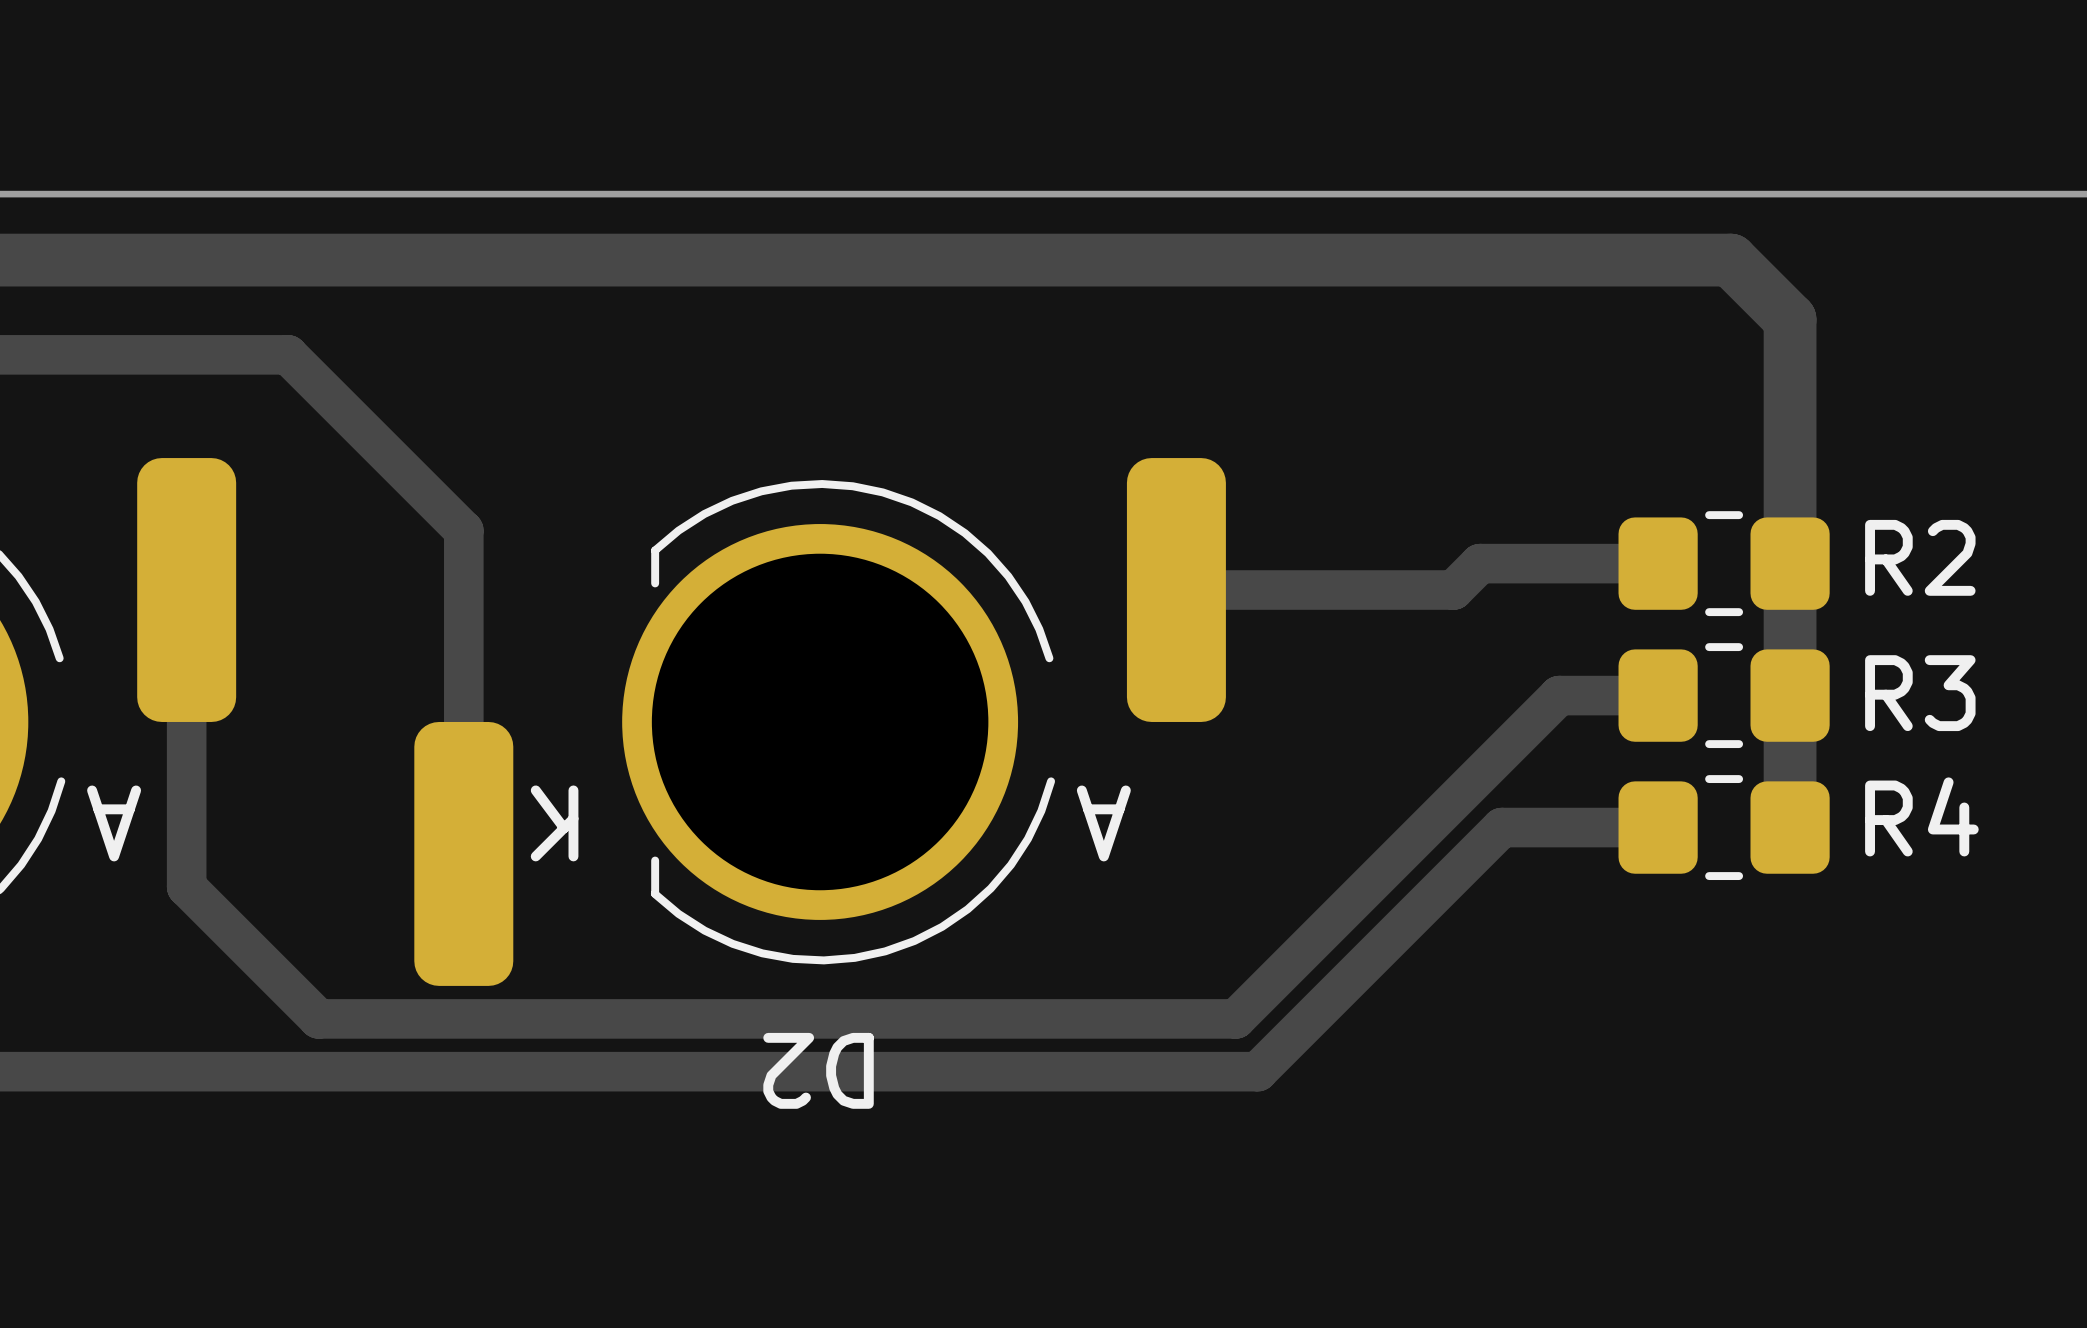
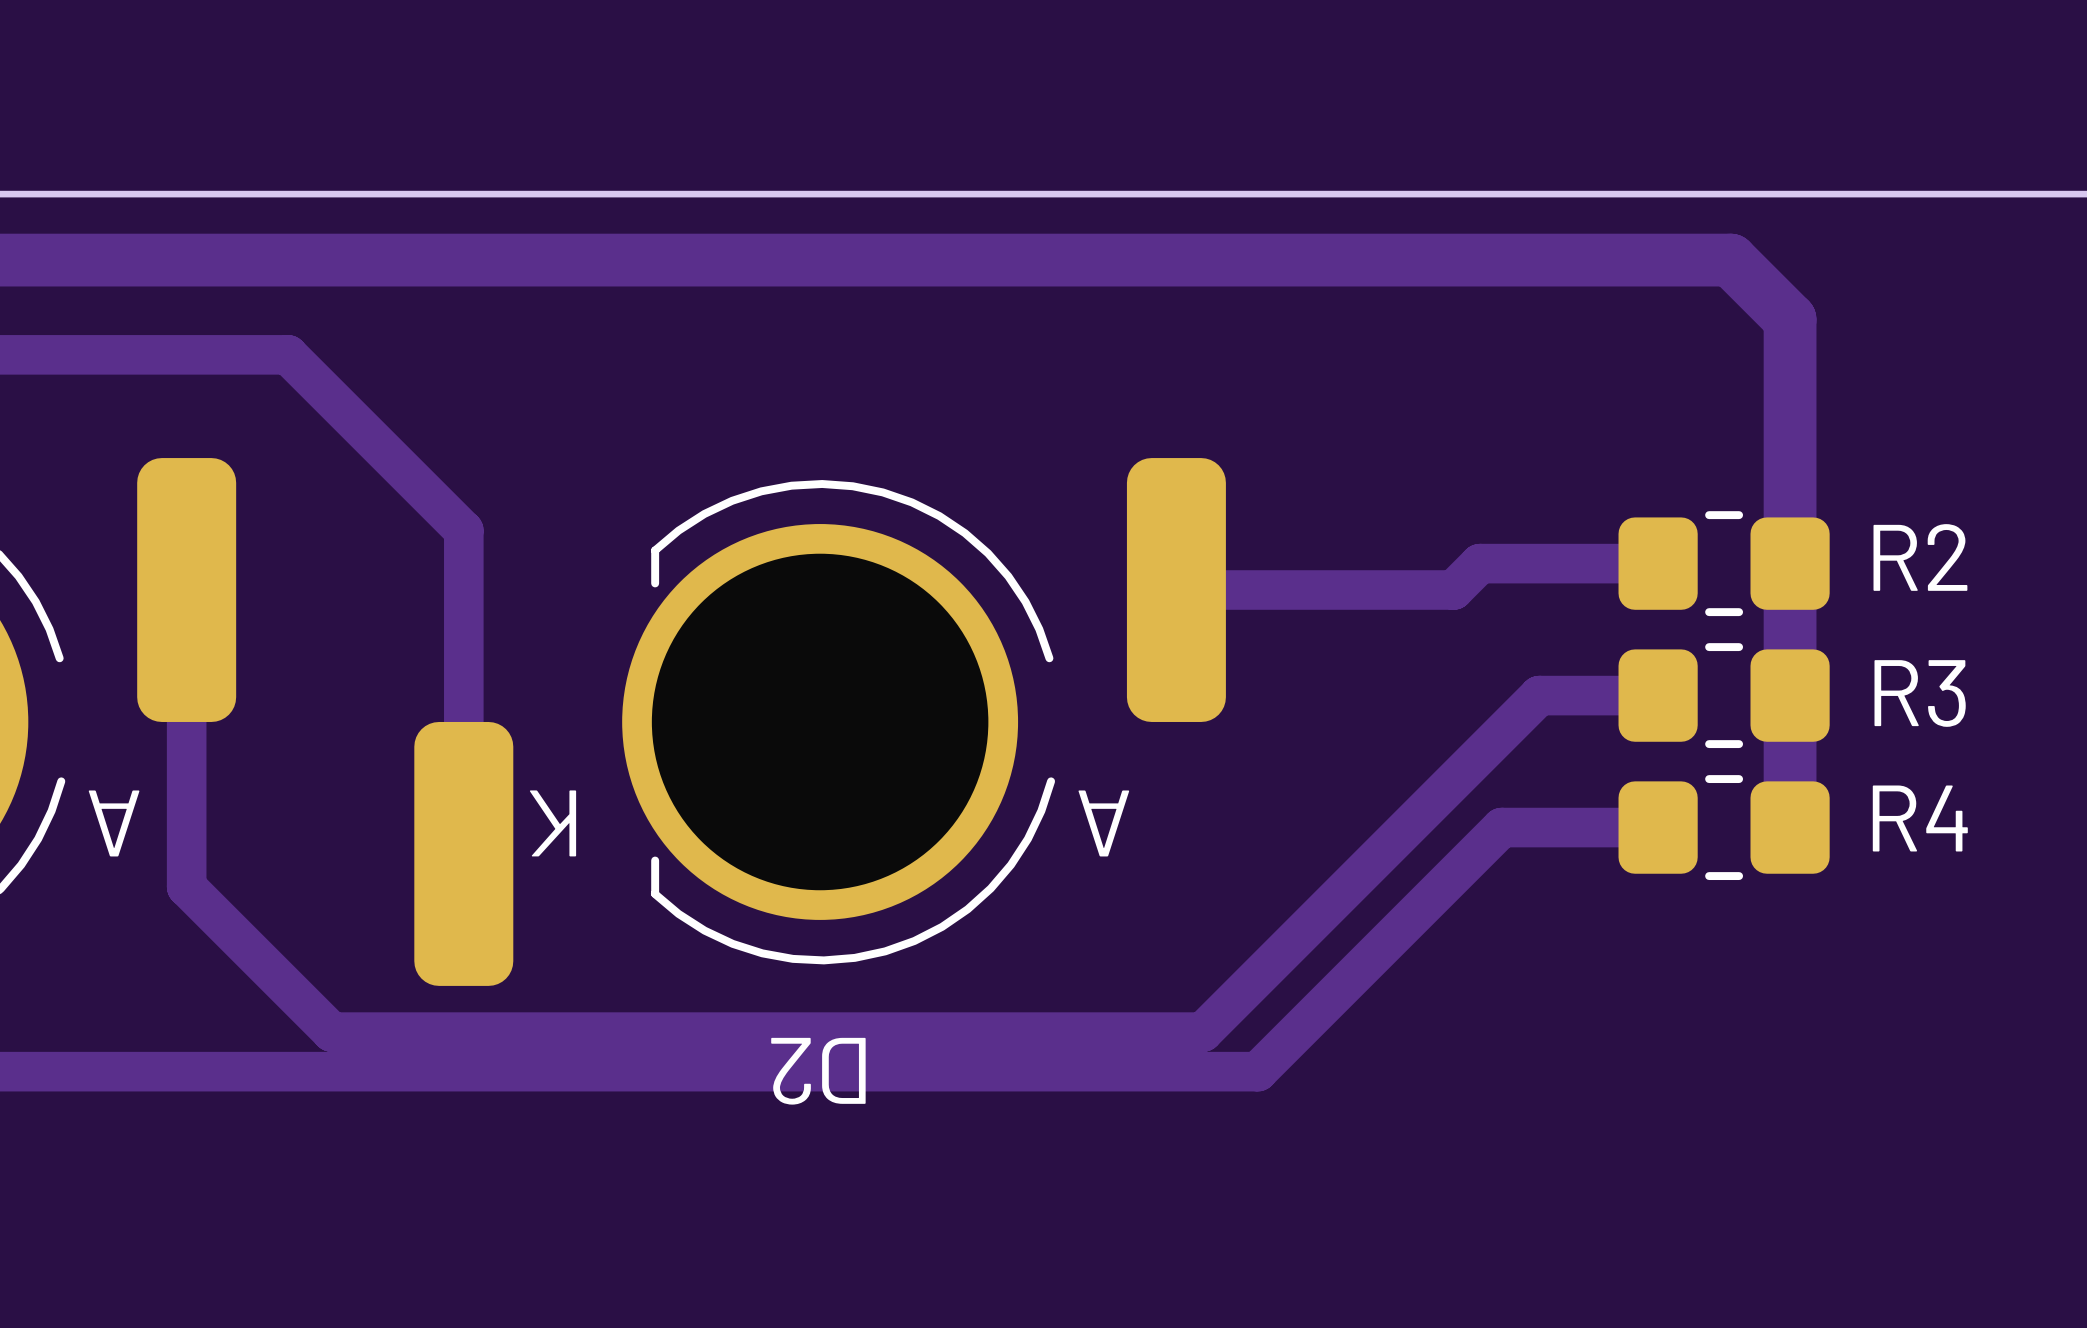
track: (1559, 695) (1235, 1018) (318, 1018) -> (1559, 695) (1539, 695) (1202, 1032) (331, 1032) (318, 1018)

